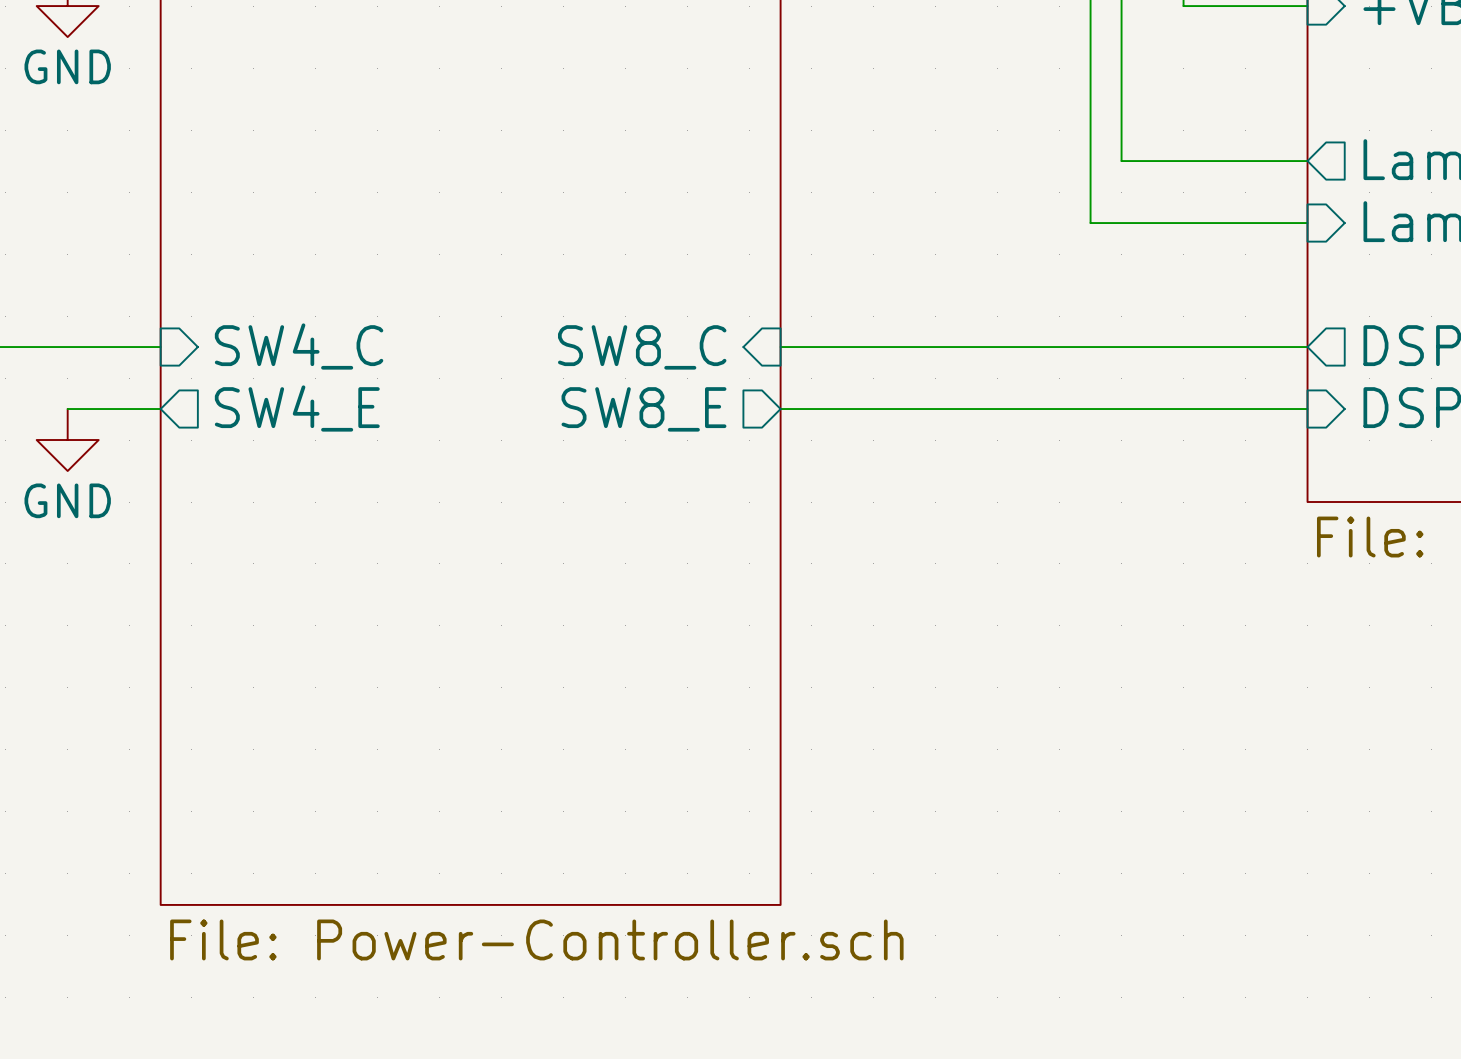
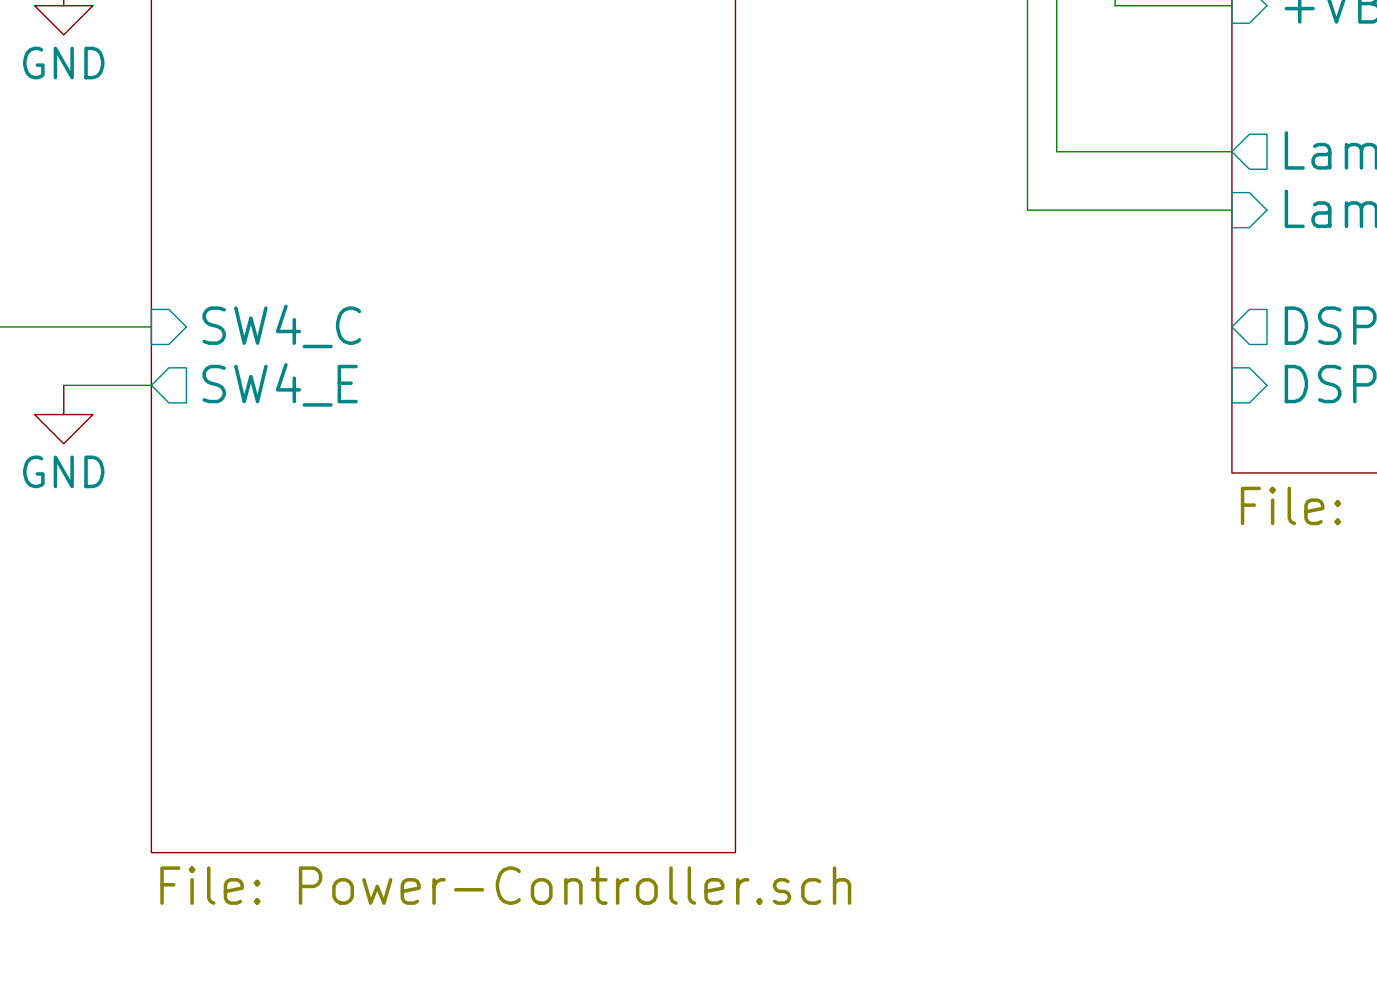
sheet pin: SW8_C (642, 347) -> none
wire: (780, 347) (1307, 347) -> none
sheet pin: SW8_E (643, 409) -> none
wire: (780, 409) (1307, 409) -> none

